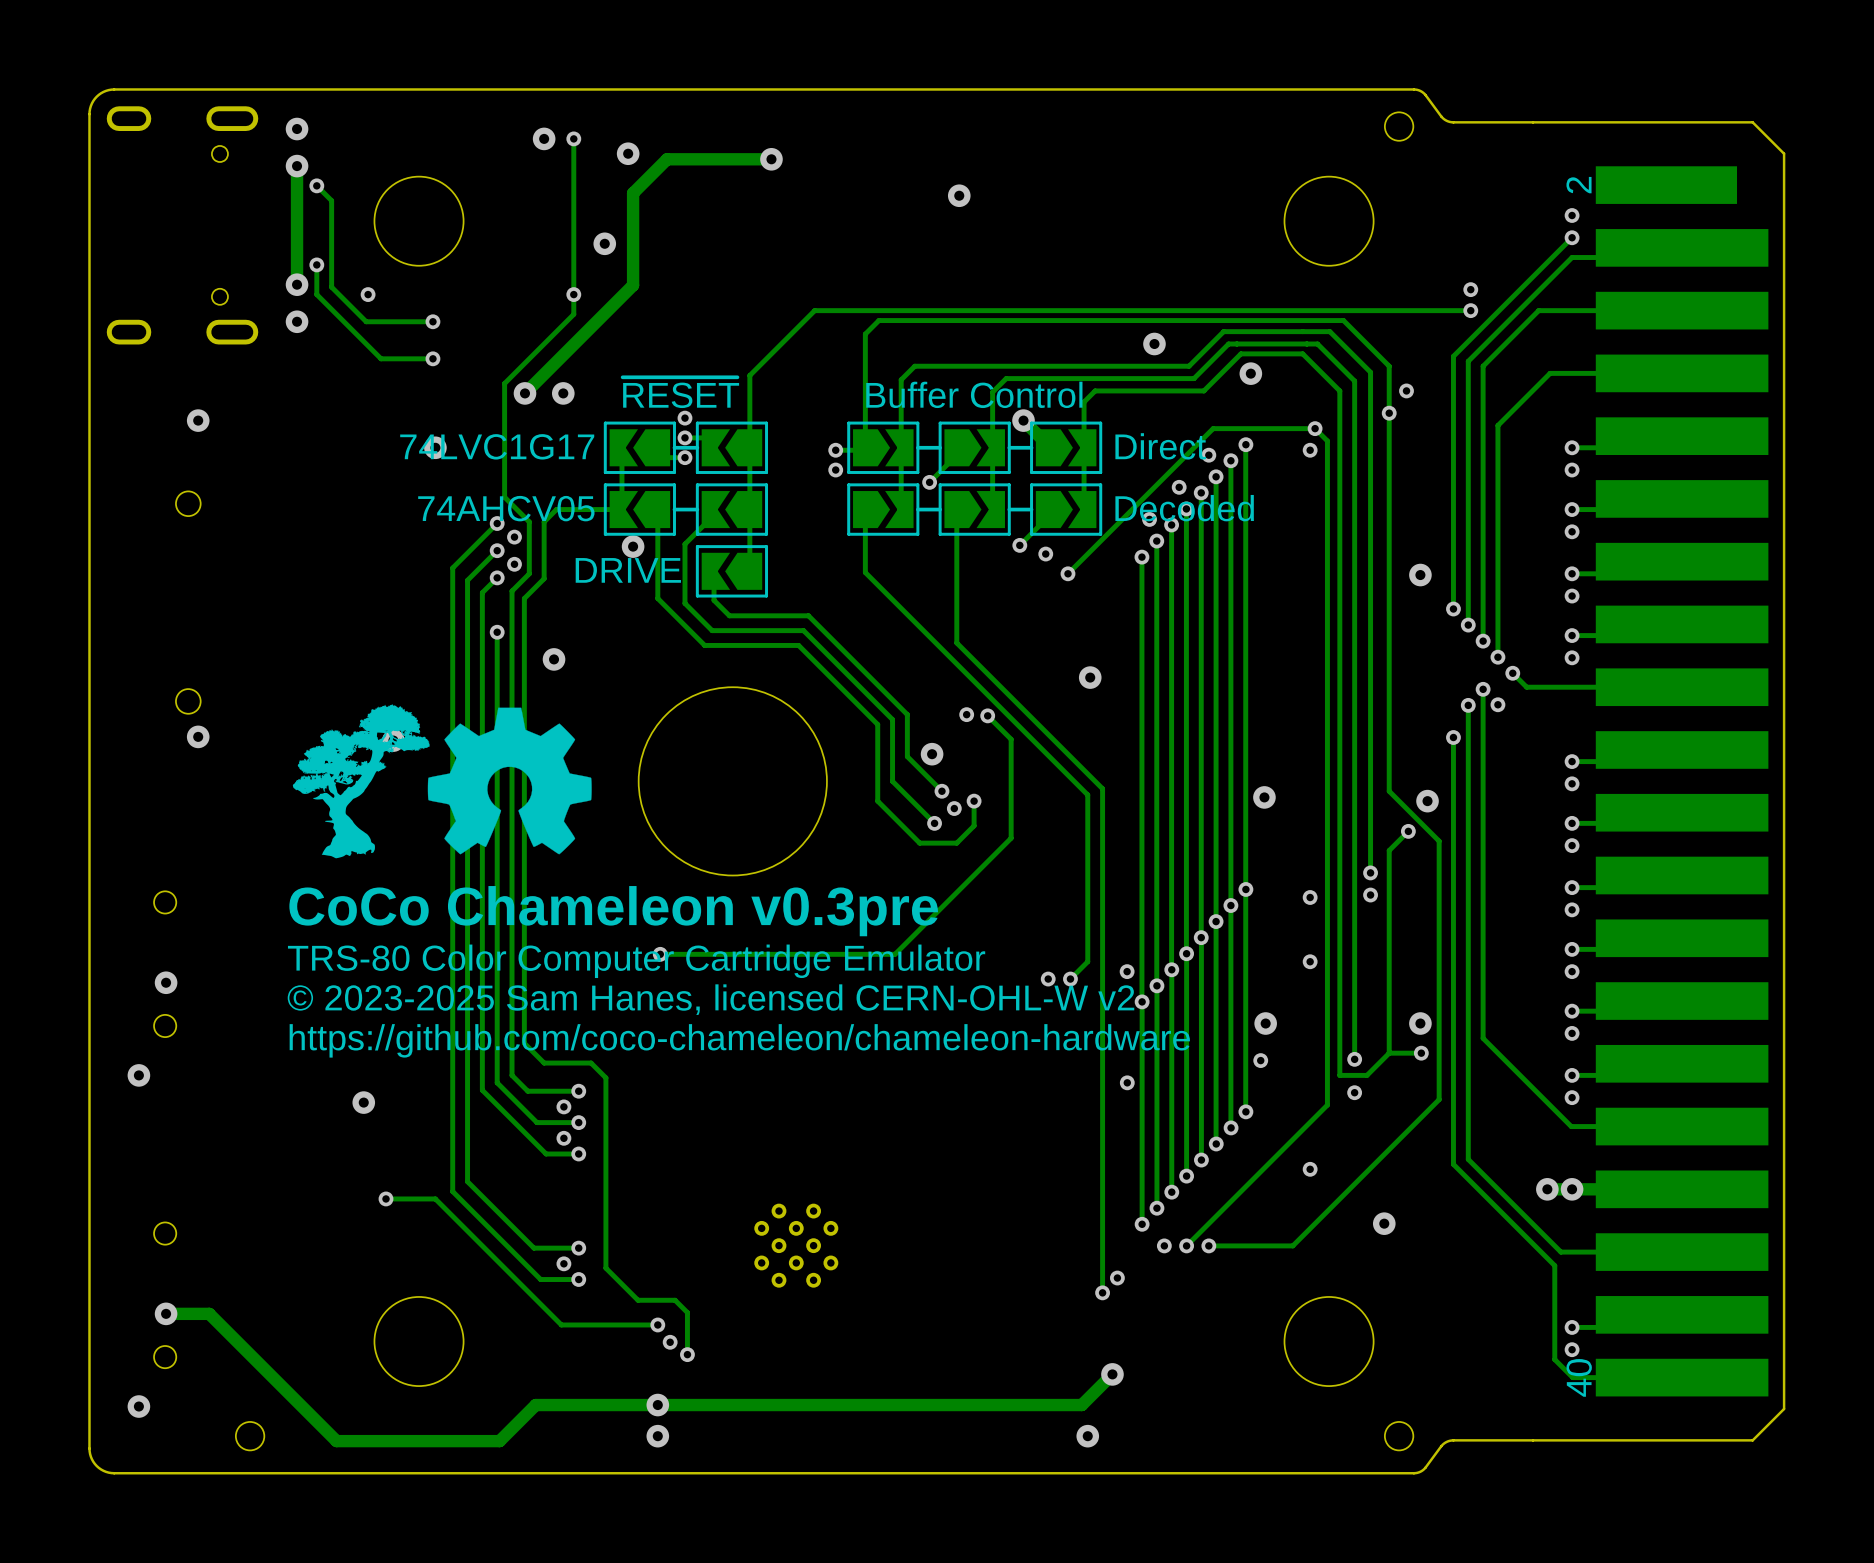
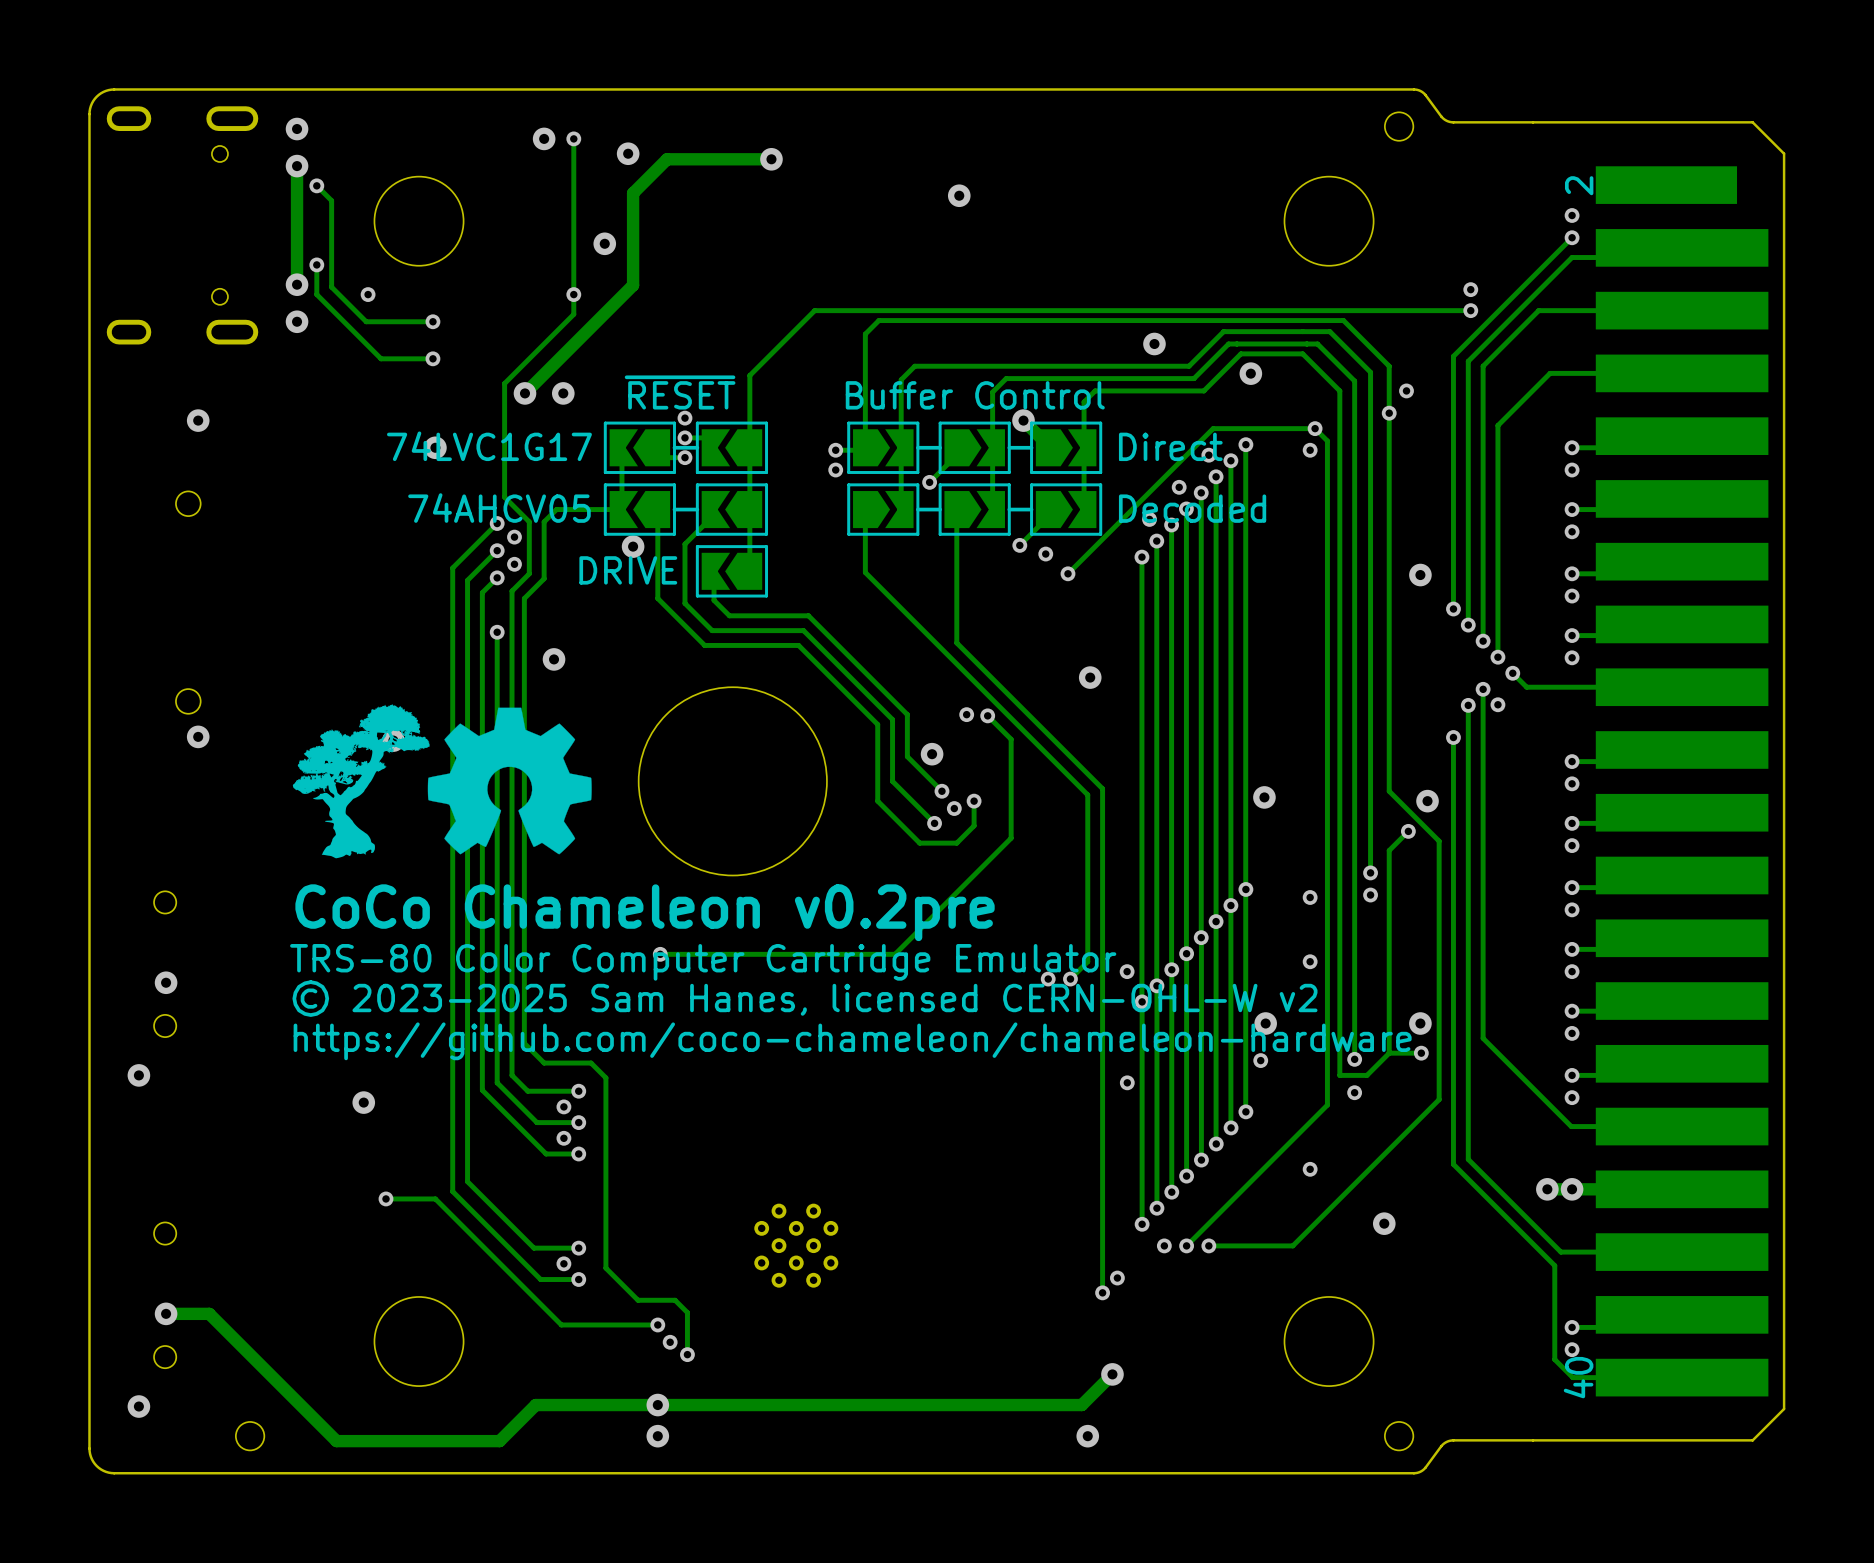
text: CoCo Chameleon v0.3pre (613, 911) -> CoCo Chameleon v0.2pre (645, 912)

